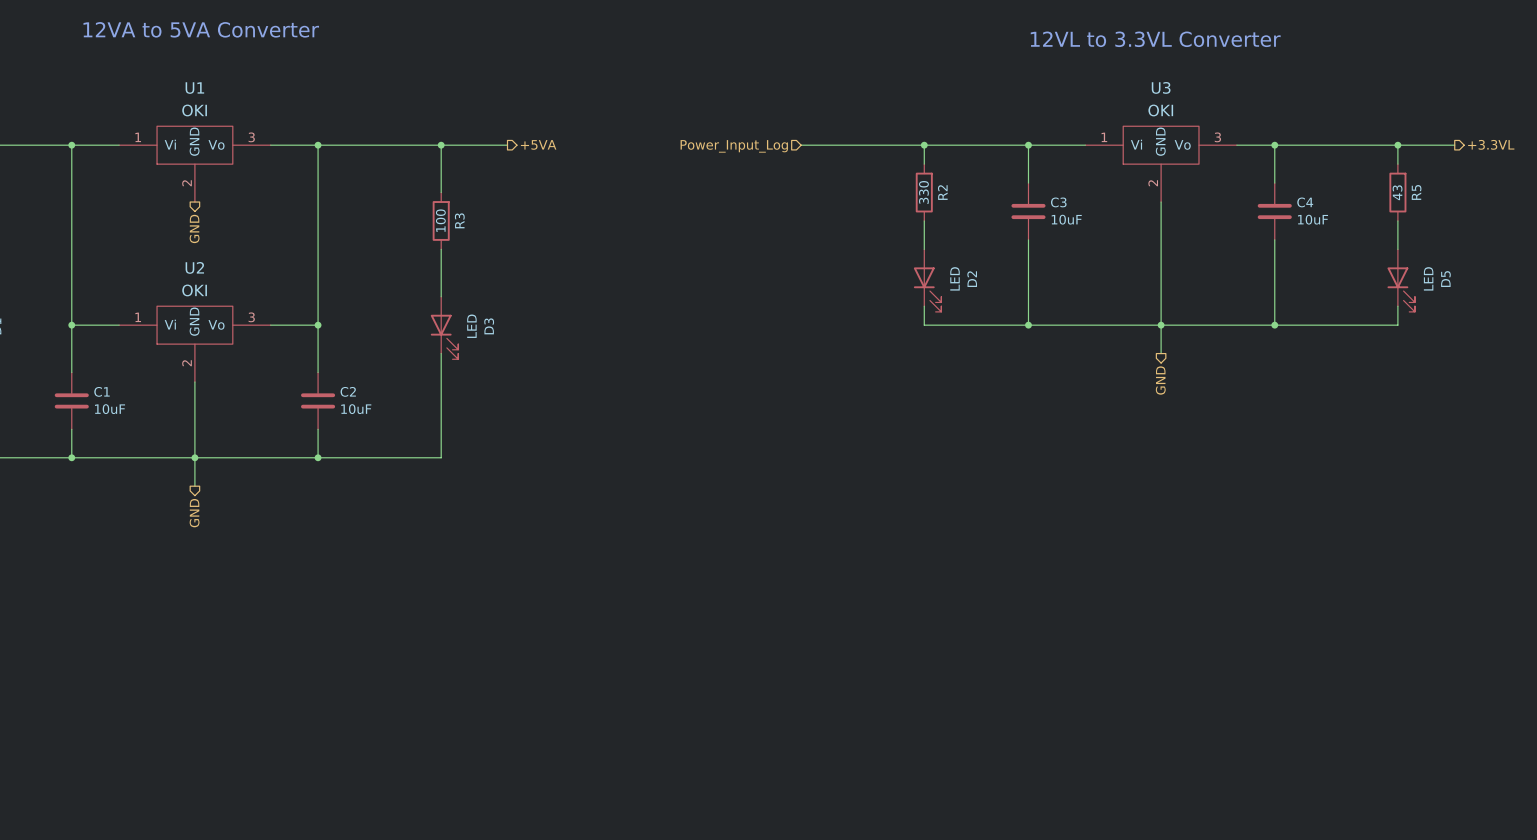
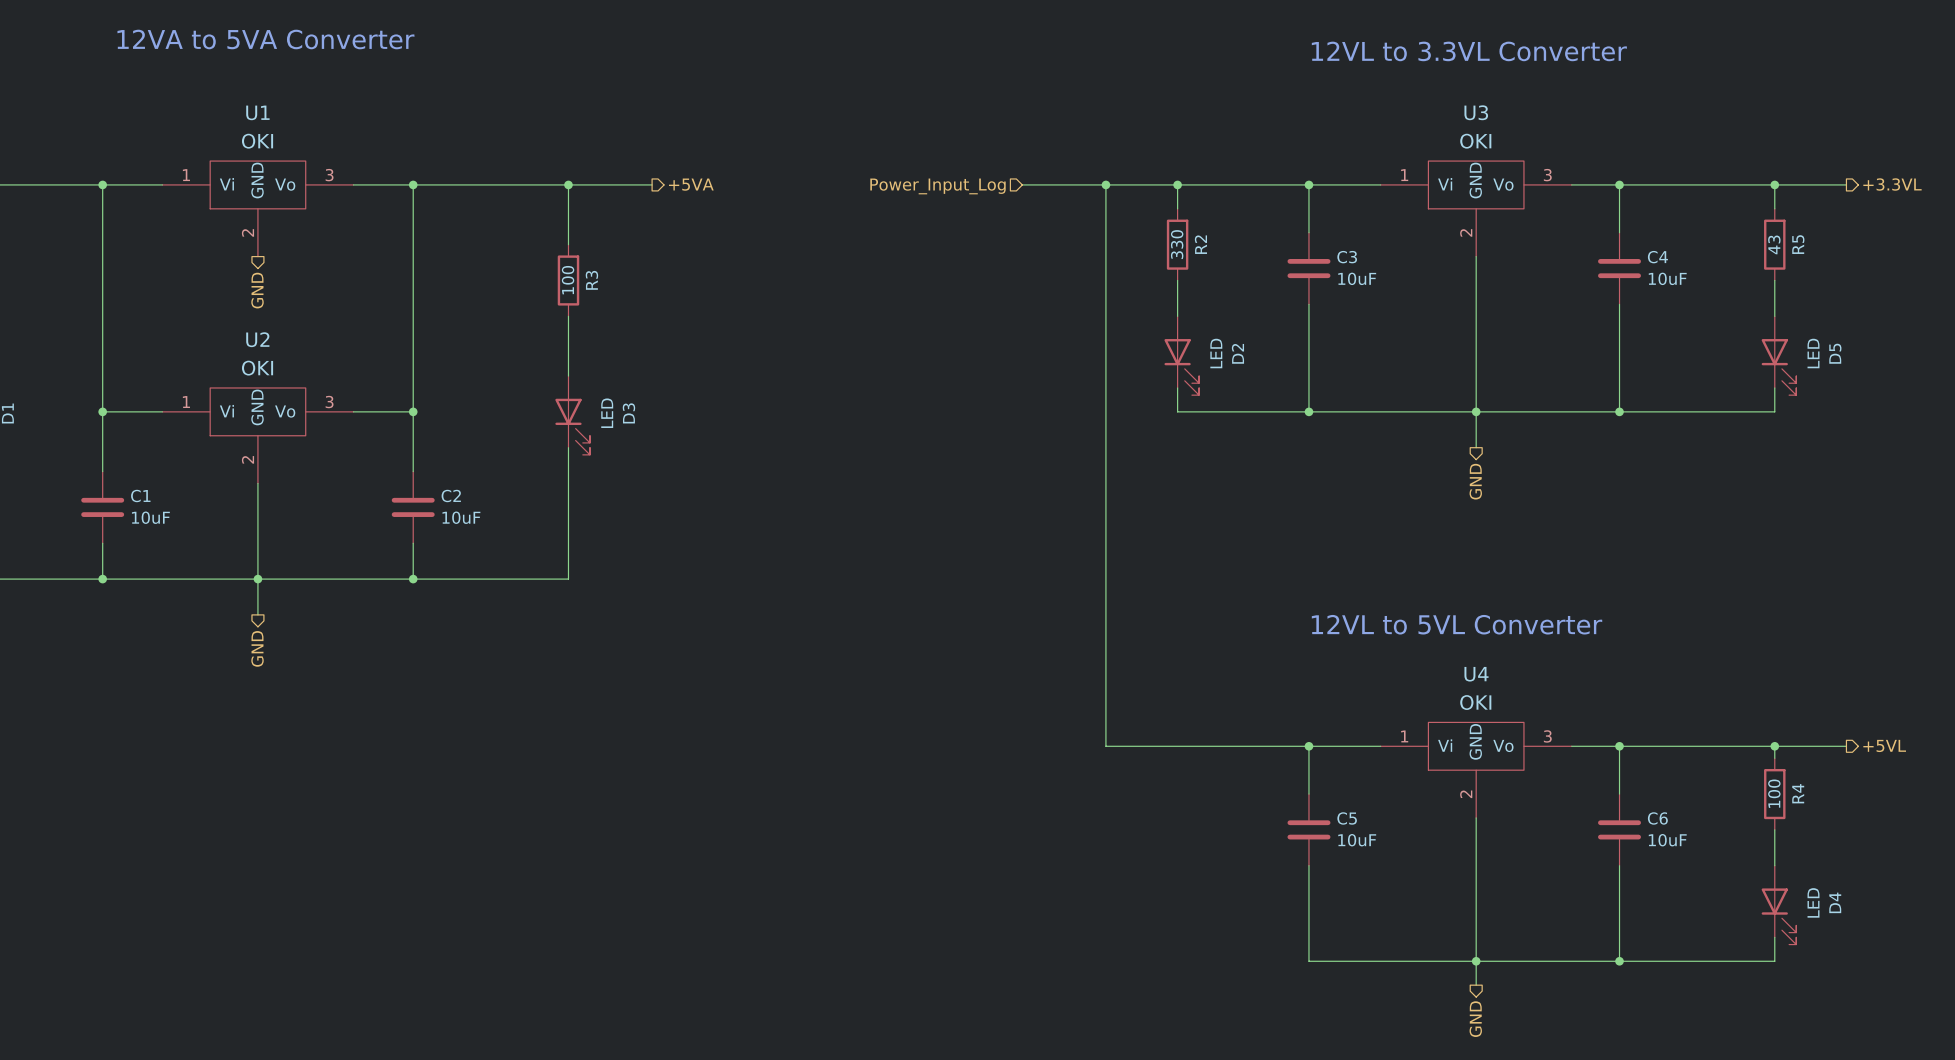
wire: none -> (1105, 184) (1105, 746) (1380, 746)
junction: none -> (1105, 184)
text: none -> 12VL to 5VL Converter (1457, 624)
wire: none -> (1308, 746) (1308, 794)
junction: none -> (1308, 746)
wire: none -> (1571, 746) (1846, 746)
wire: none -> (1619, 746) (1619, 794)
junction: none -> (1619, 746)
wire: none -> (1774, 746) (1774, 758)
junction: none -> (1774, 746)
hierarchical label: none -> +5VL (1884, 745)
U4: none -> OKI (1476, 770)
R4: none -> 100 (1774, 794)
wire: none -> (1476, 817) (1476, 985)
C5: none -> 10uF (1308, 829)
C6: none -> 10uF (1619, 829)
wire: none -> (1774, 829) (1774, 865)
wire: none -> (1308, 865) (1308, 961) (1774, 961) (1774, 937)
wire: none -> (1619, 865) (1619, 961)
D4: none -> LED (1778, 905)
junction: none -> (1476, 961)
junction: none -> (1619, 961)
hierarchical label: none -> GND (1475, 1019)

